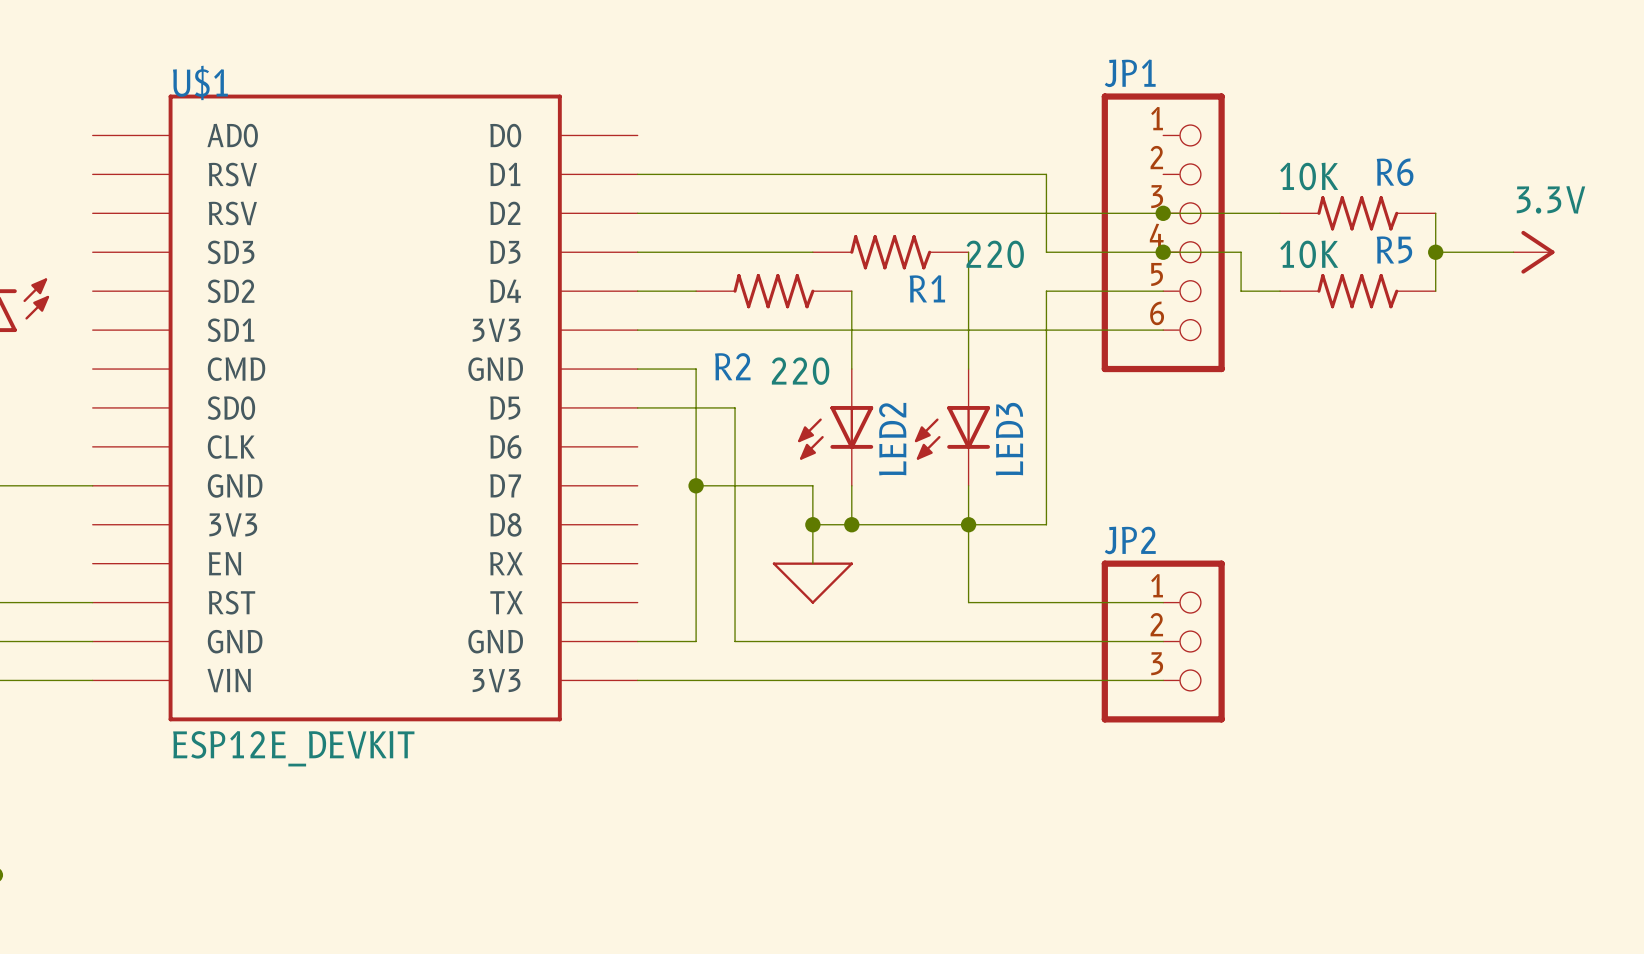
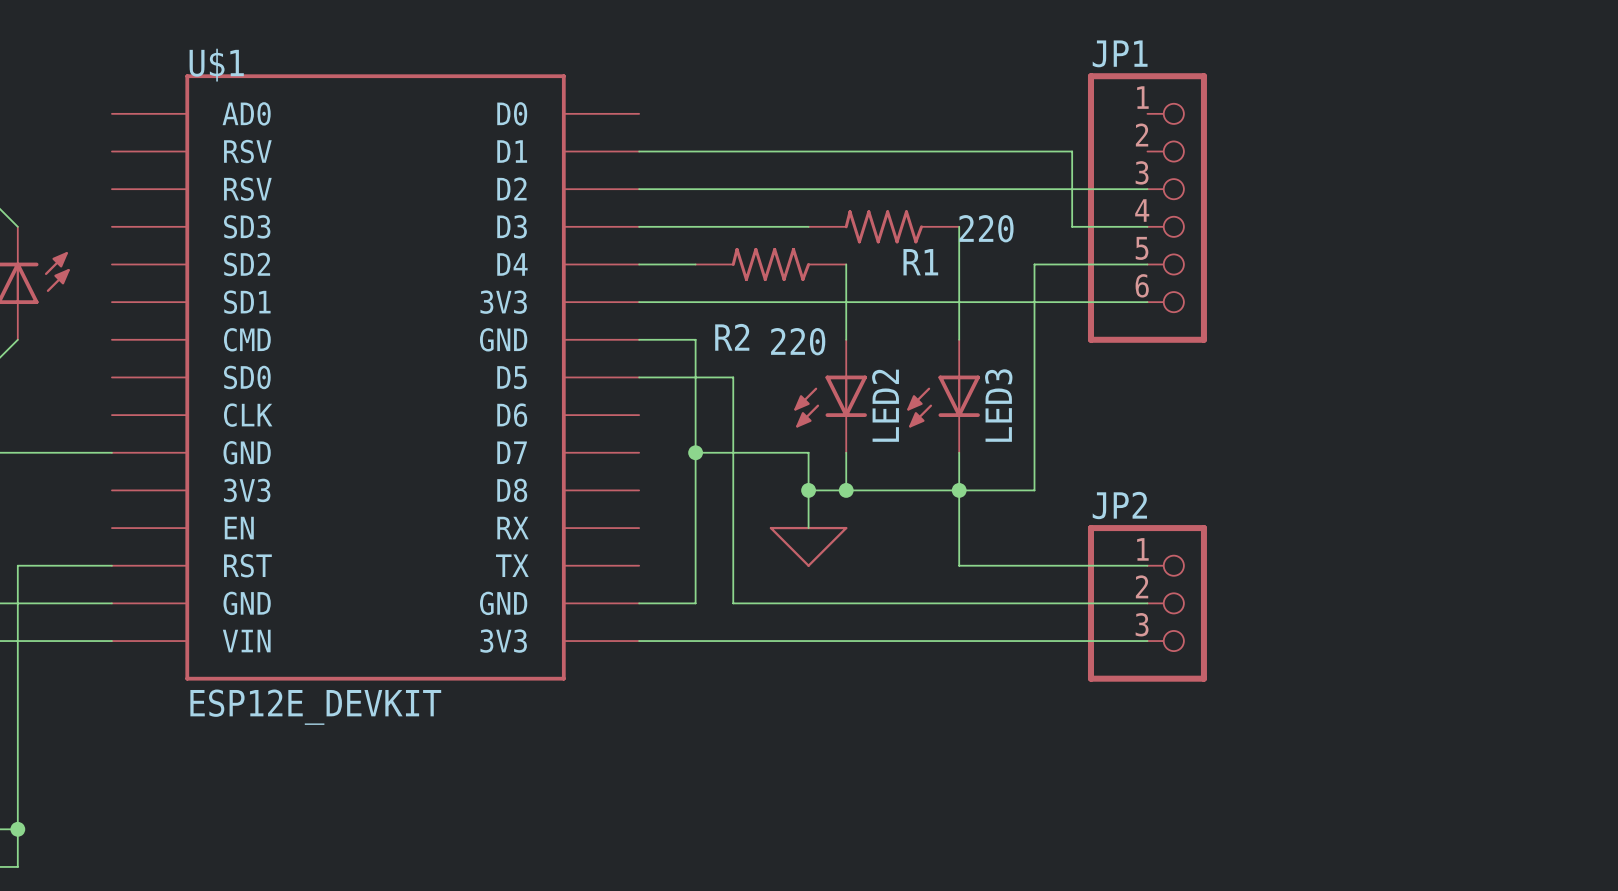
wire: (1046, 174) (1046, 252) (1085, 252) -> (1034, 151) (1072, 151) (1072, 226)
wire: (1163, 213) (1279, 213) -> none
junction: (1163, 213) -> none
R6: 10K (1357, 213) -> none
wire: (1435, 213) (1435, 291) -> none
wire: (1163, 252) (1241, 252) (1241, 291) (1279, 291) -> none
junction: (1163, 252) -> none
wire: (1435, 252) (1513, 252) -> none
junction: (1435, 252) -> none
power symbol: 3.3V (1533, 252) -> none
R5: 10K (1357, 291) -> none

